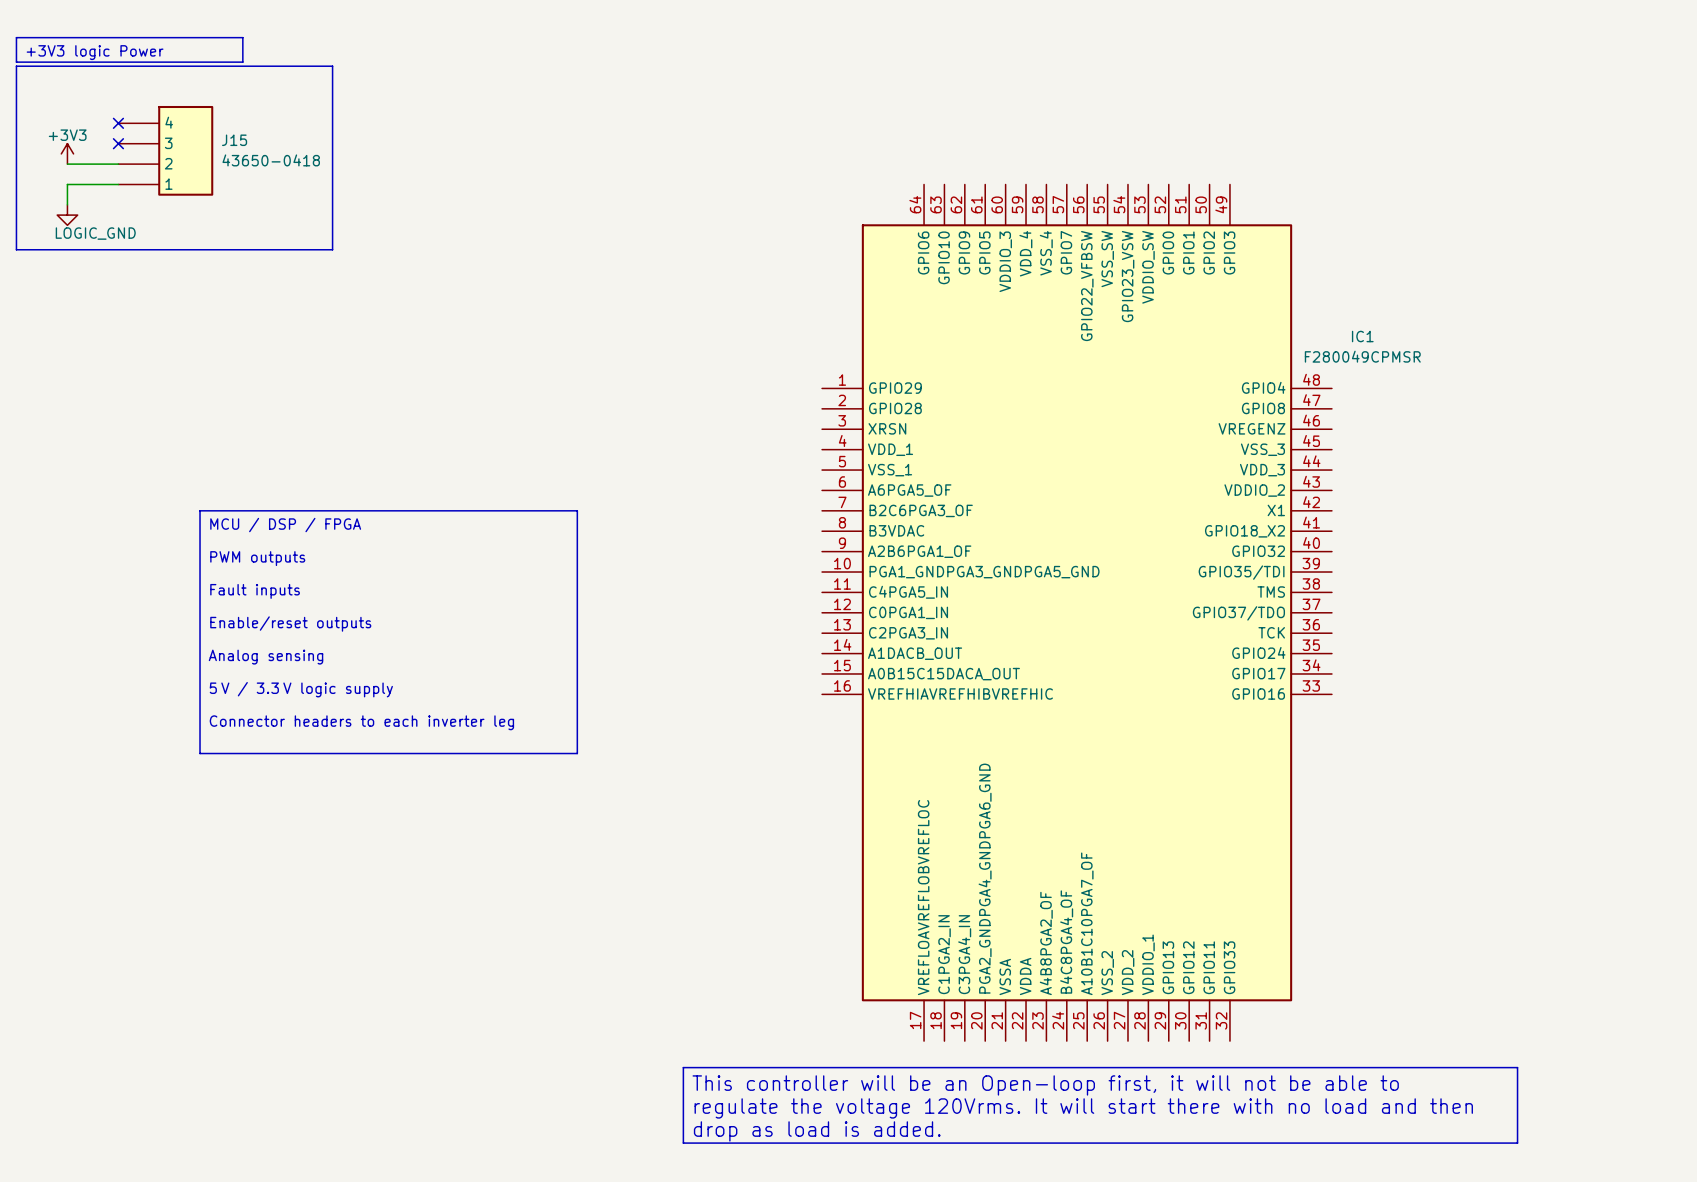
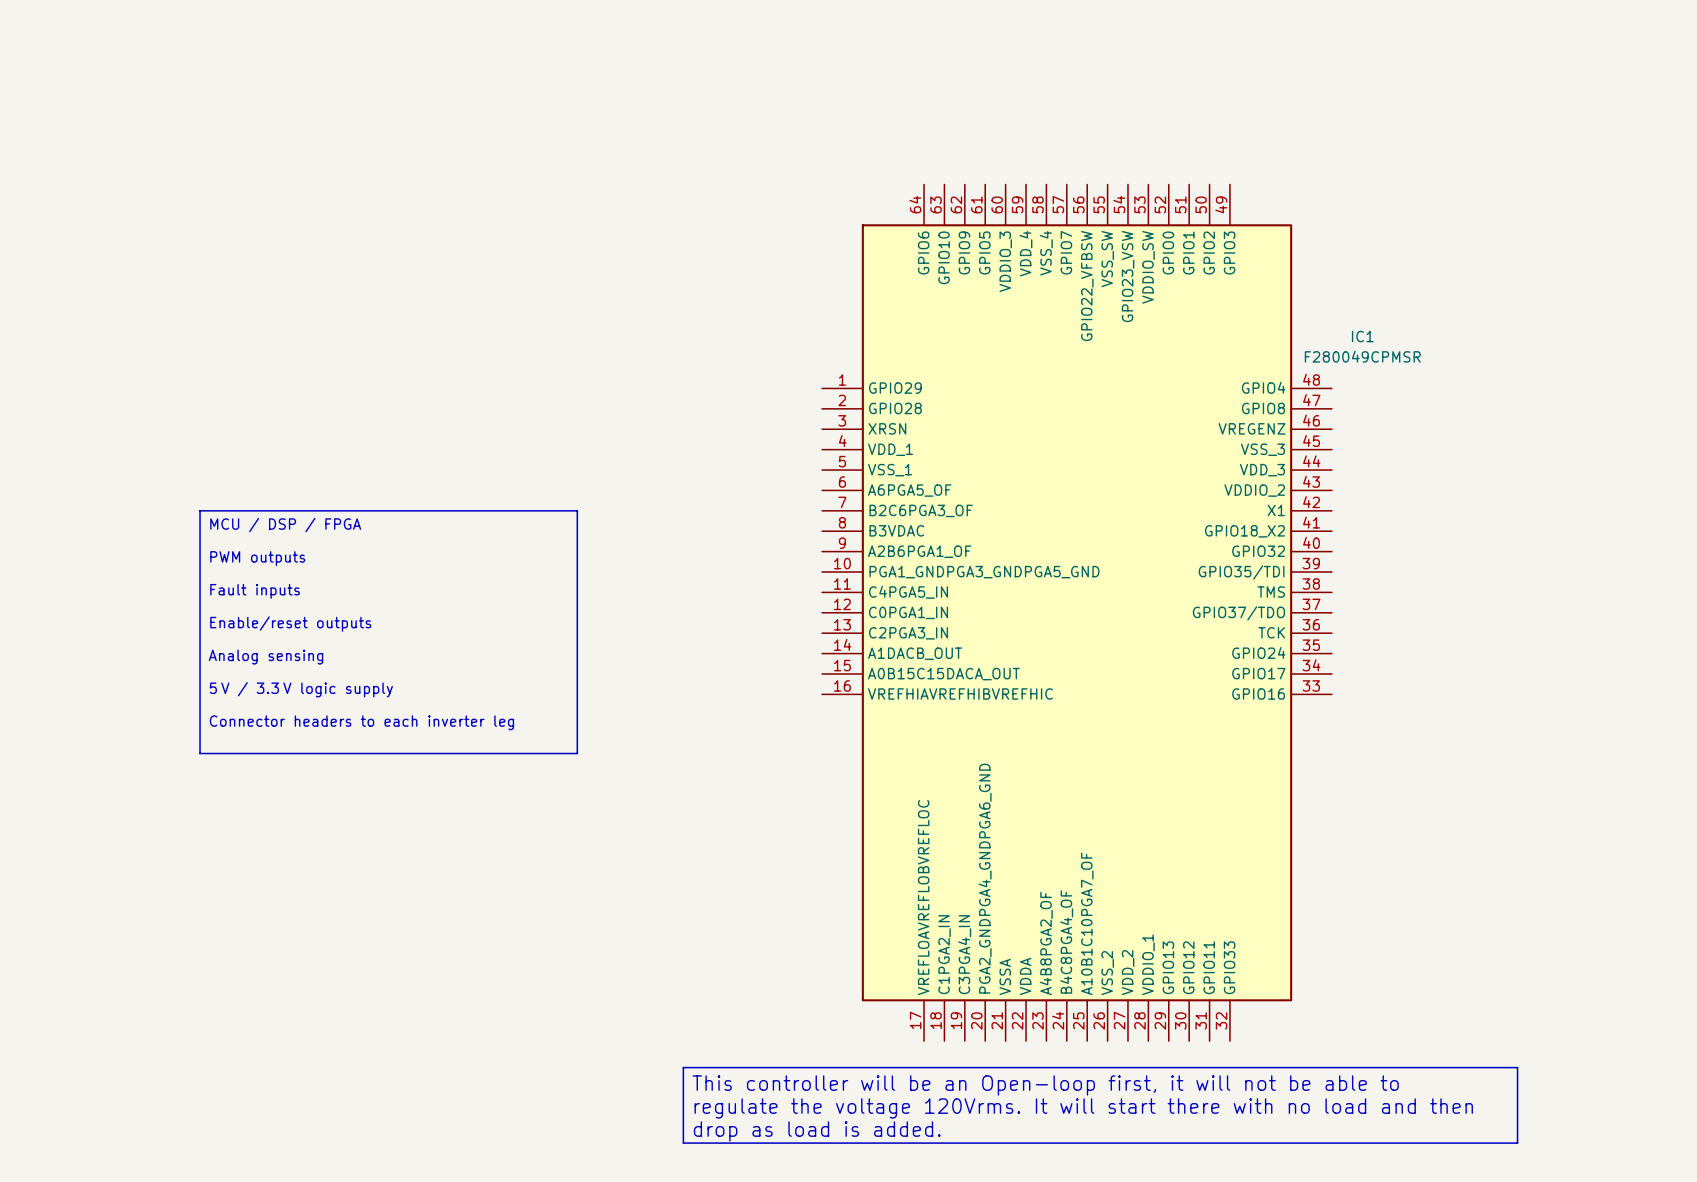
line: (16, 37) (16, 62) (242, 62) (242, 37) (16, 37) -> none
text: +3V3 logic Power (95, 52) -> none
line: (16, 66) (332, 66) (332, 249) (16, 249) (16, 66) -> none
no-connect mark: (118, 123) -> none
no-connect mark: (118, 143) -> none
J15: 43650-0418 (165, 150) -> none
power symbol: +3V3 (67, 153) -> none
wire: (67, 164) (118, 164) -> none
wire: (118, 184) (67, 184) (67, 204) -> none
power symbol: LOGIC_GND (67, 215) -> none

